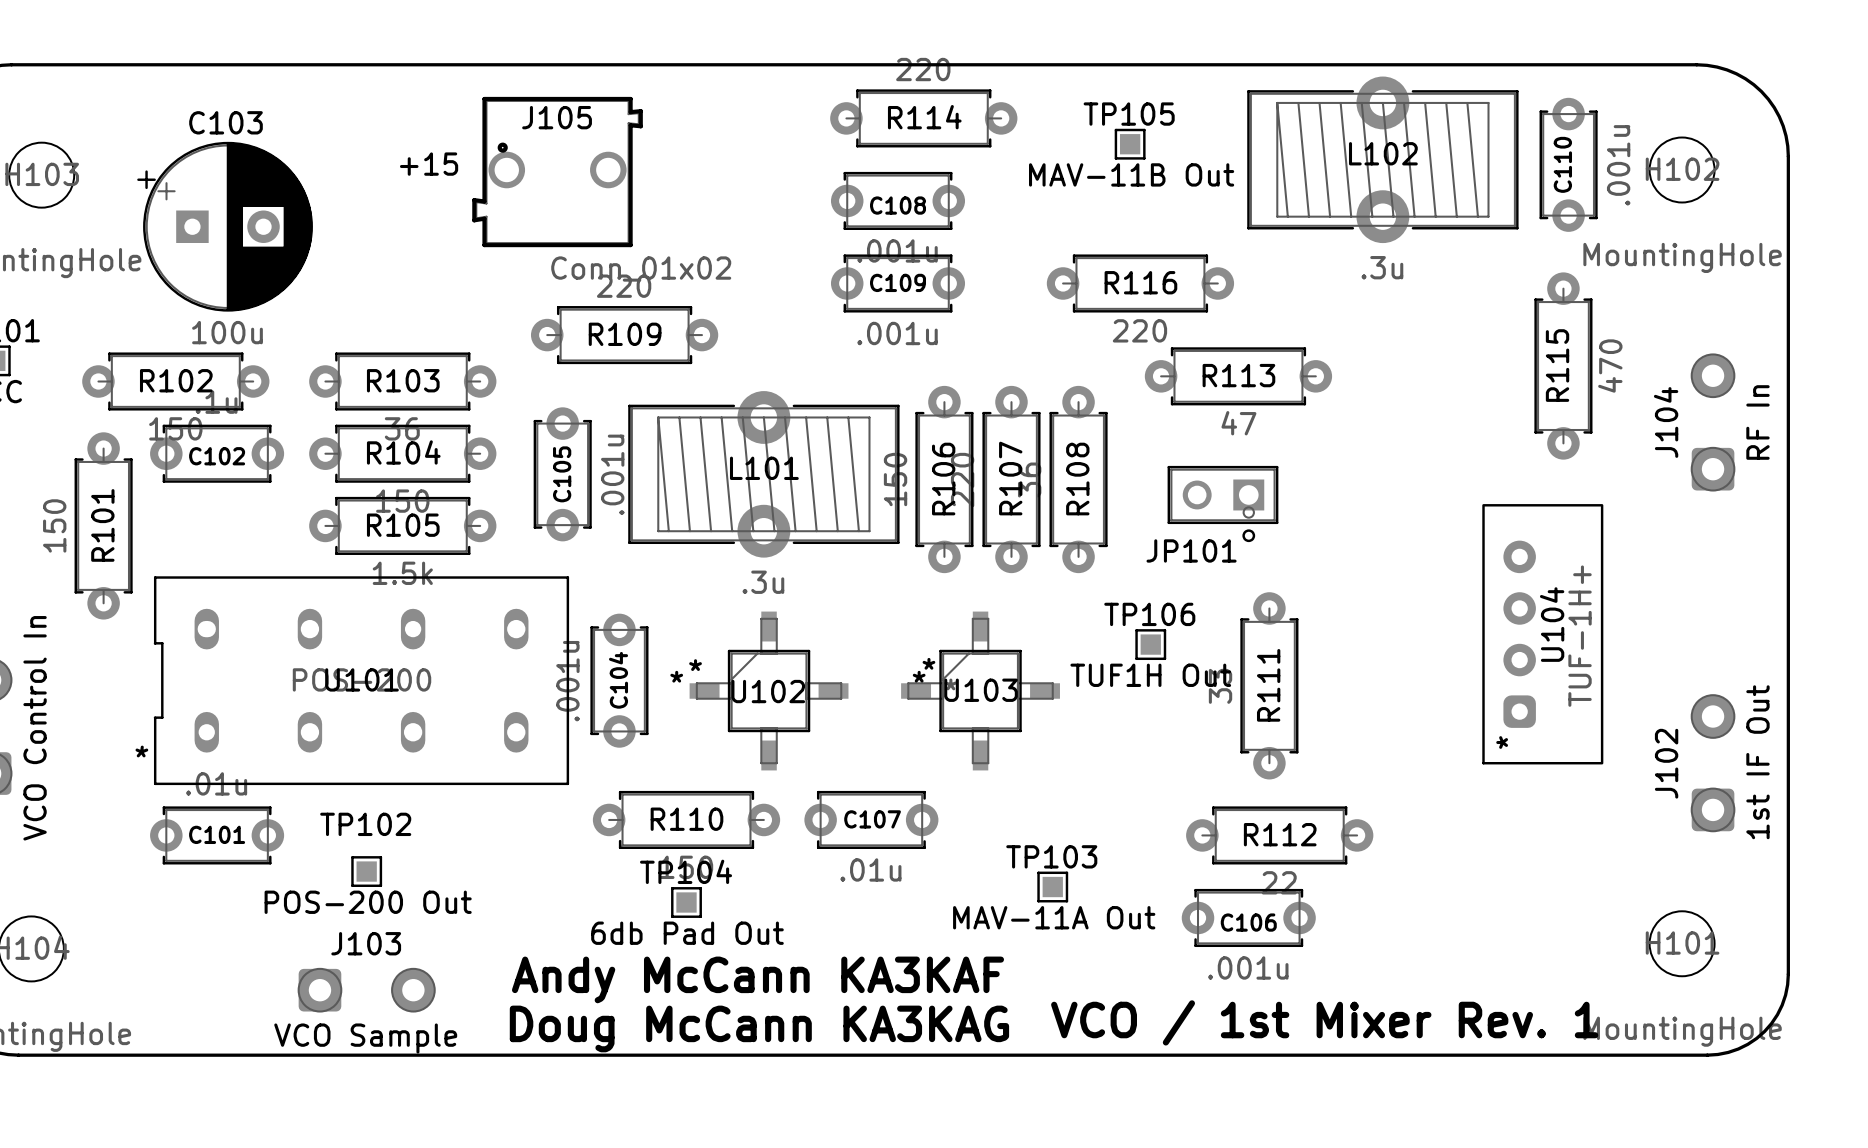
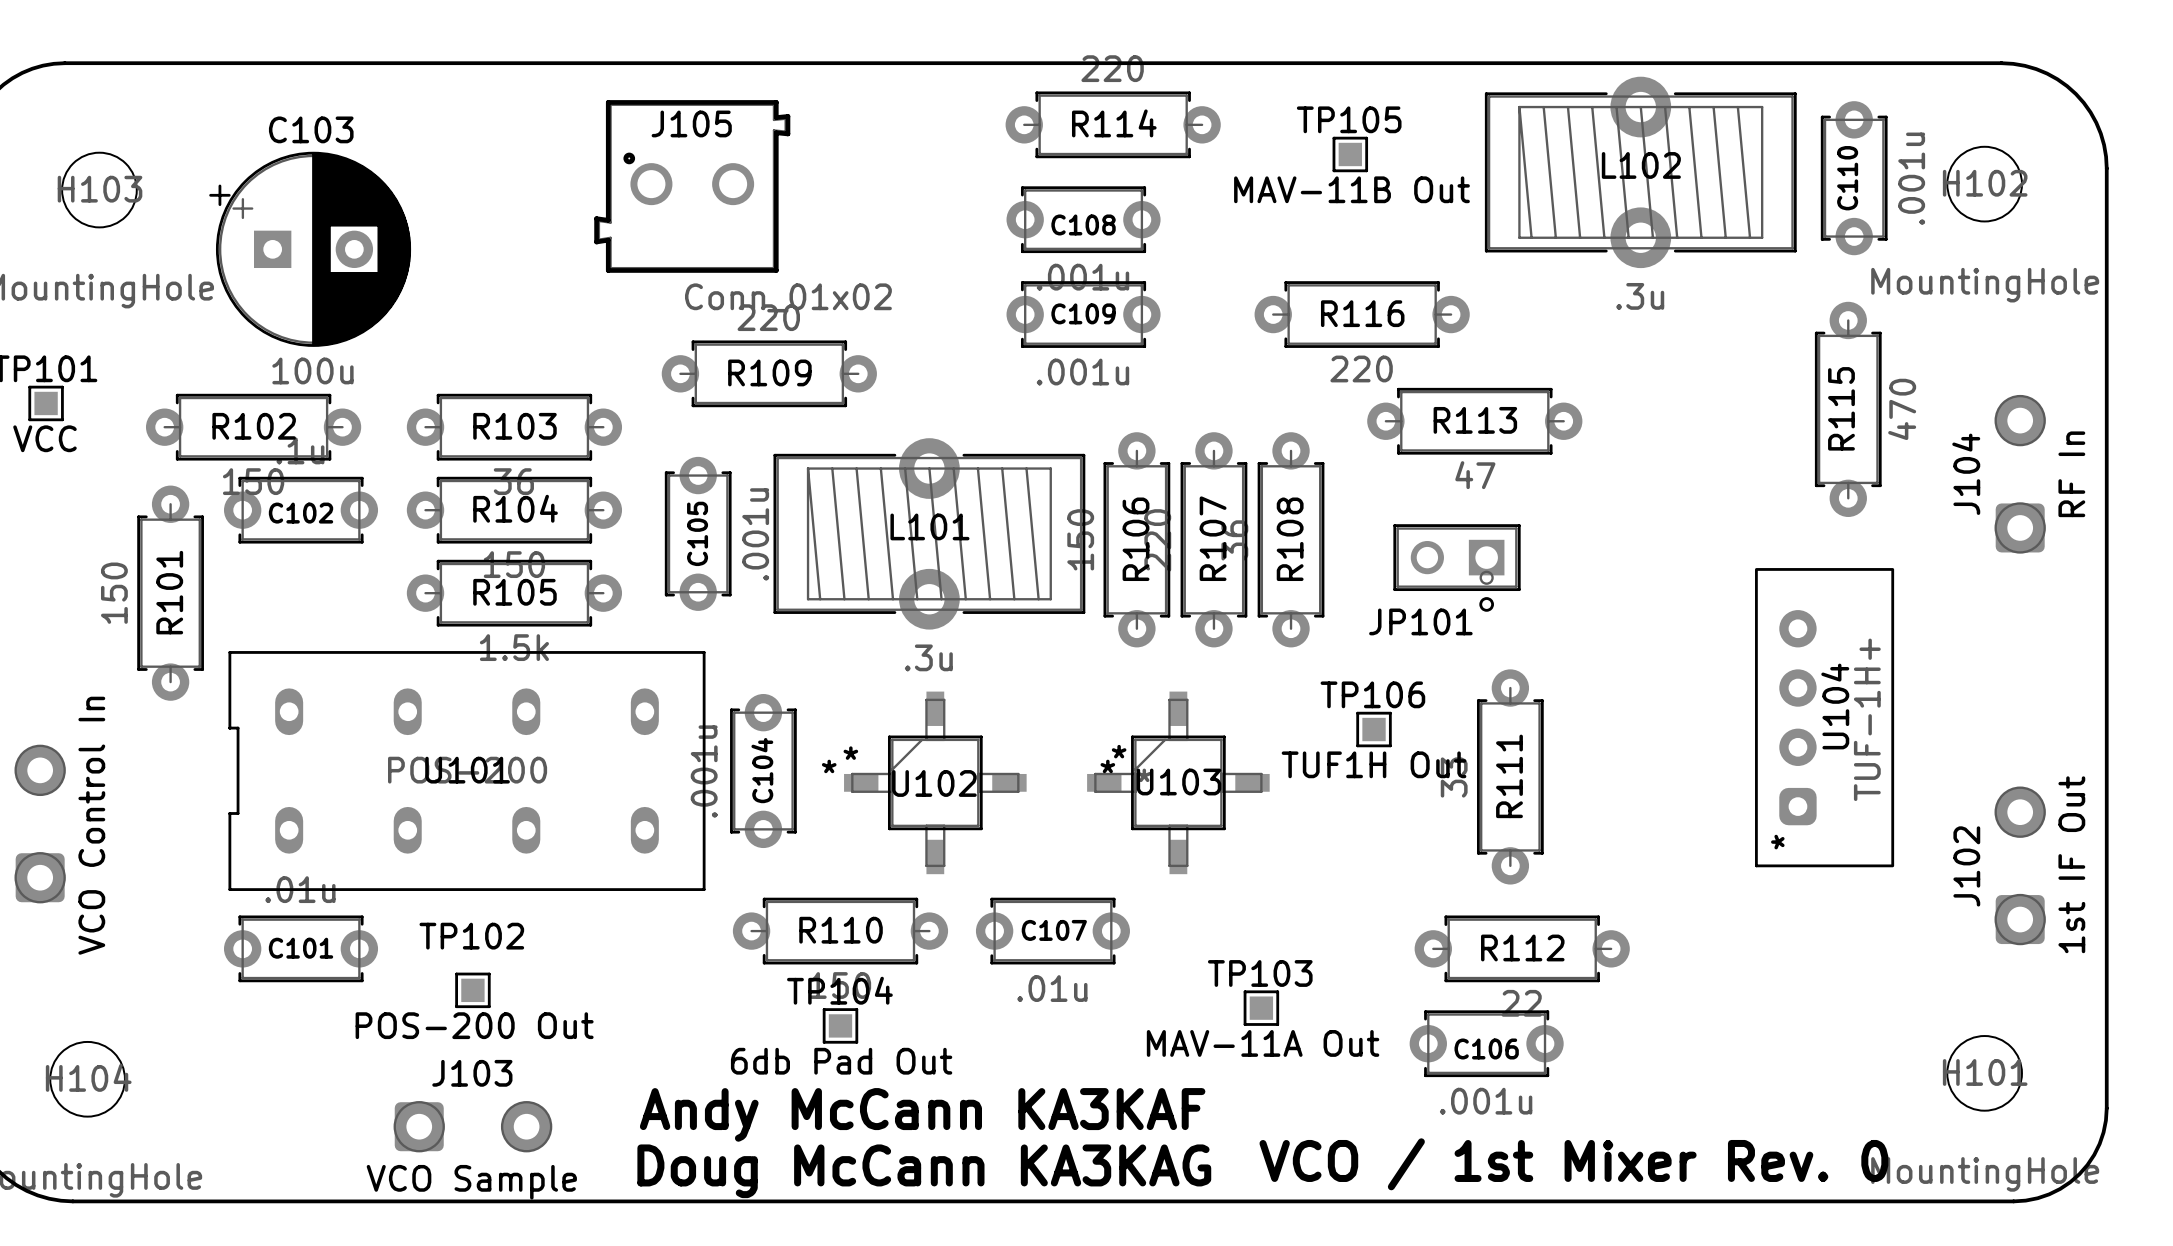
J105 footprint: [472, 96, 643, 248] -> [594, 100, 791, 273]
text: +15 (429, 164) -> none
U101 footprint: [153, 576, 570, 786] -> [228, 651, 706, 891]
text: VCO / 1st Mixer Rev. 1 (1324, 1022) -> VCO / 1st Mixer Rev. 0 (1573, 1164)

